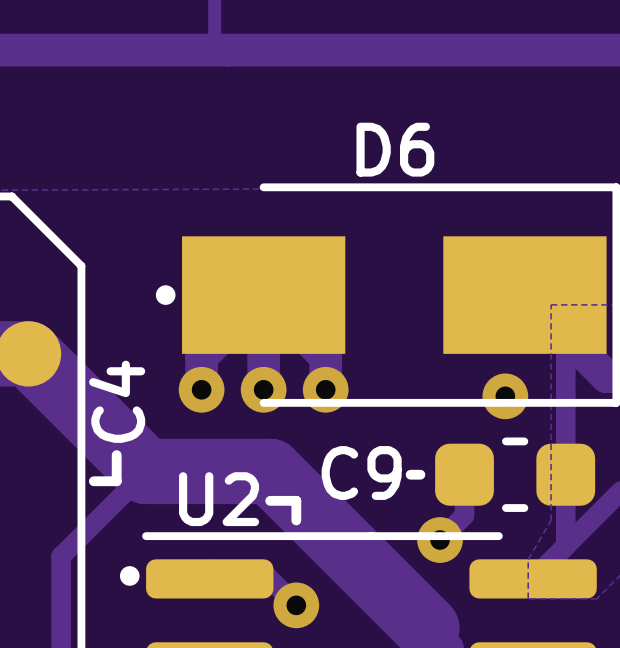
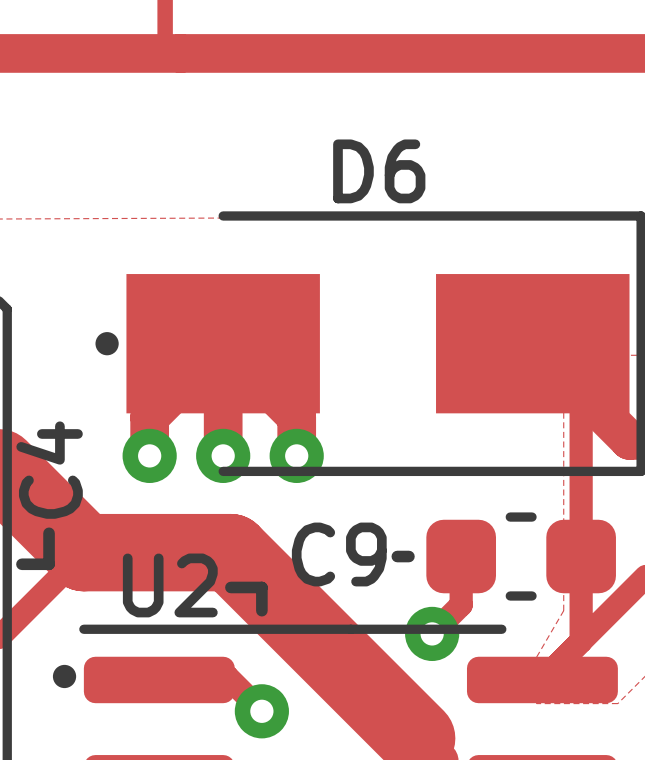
via: (505, 396) -> none

